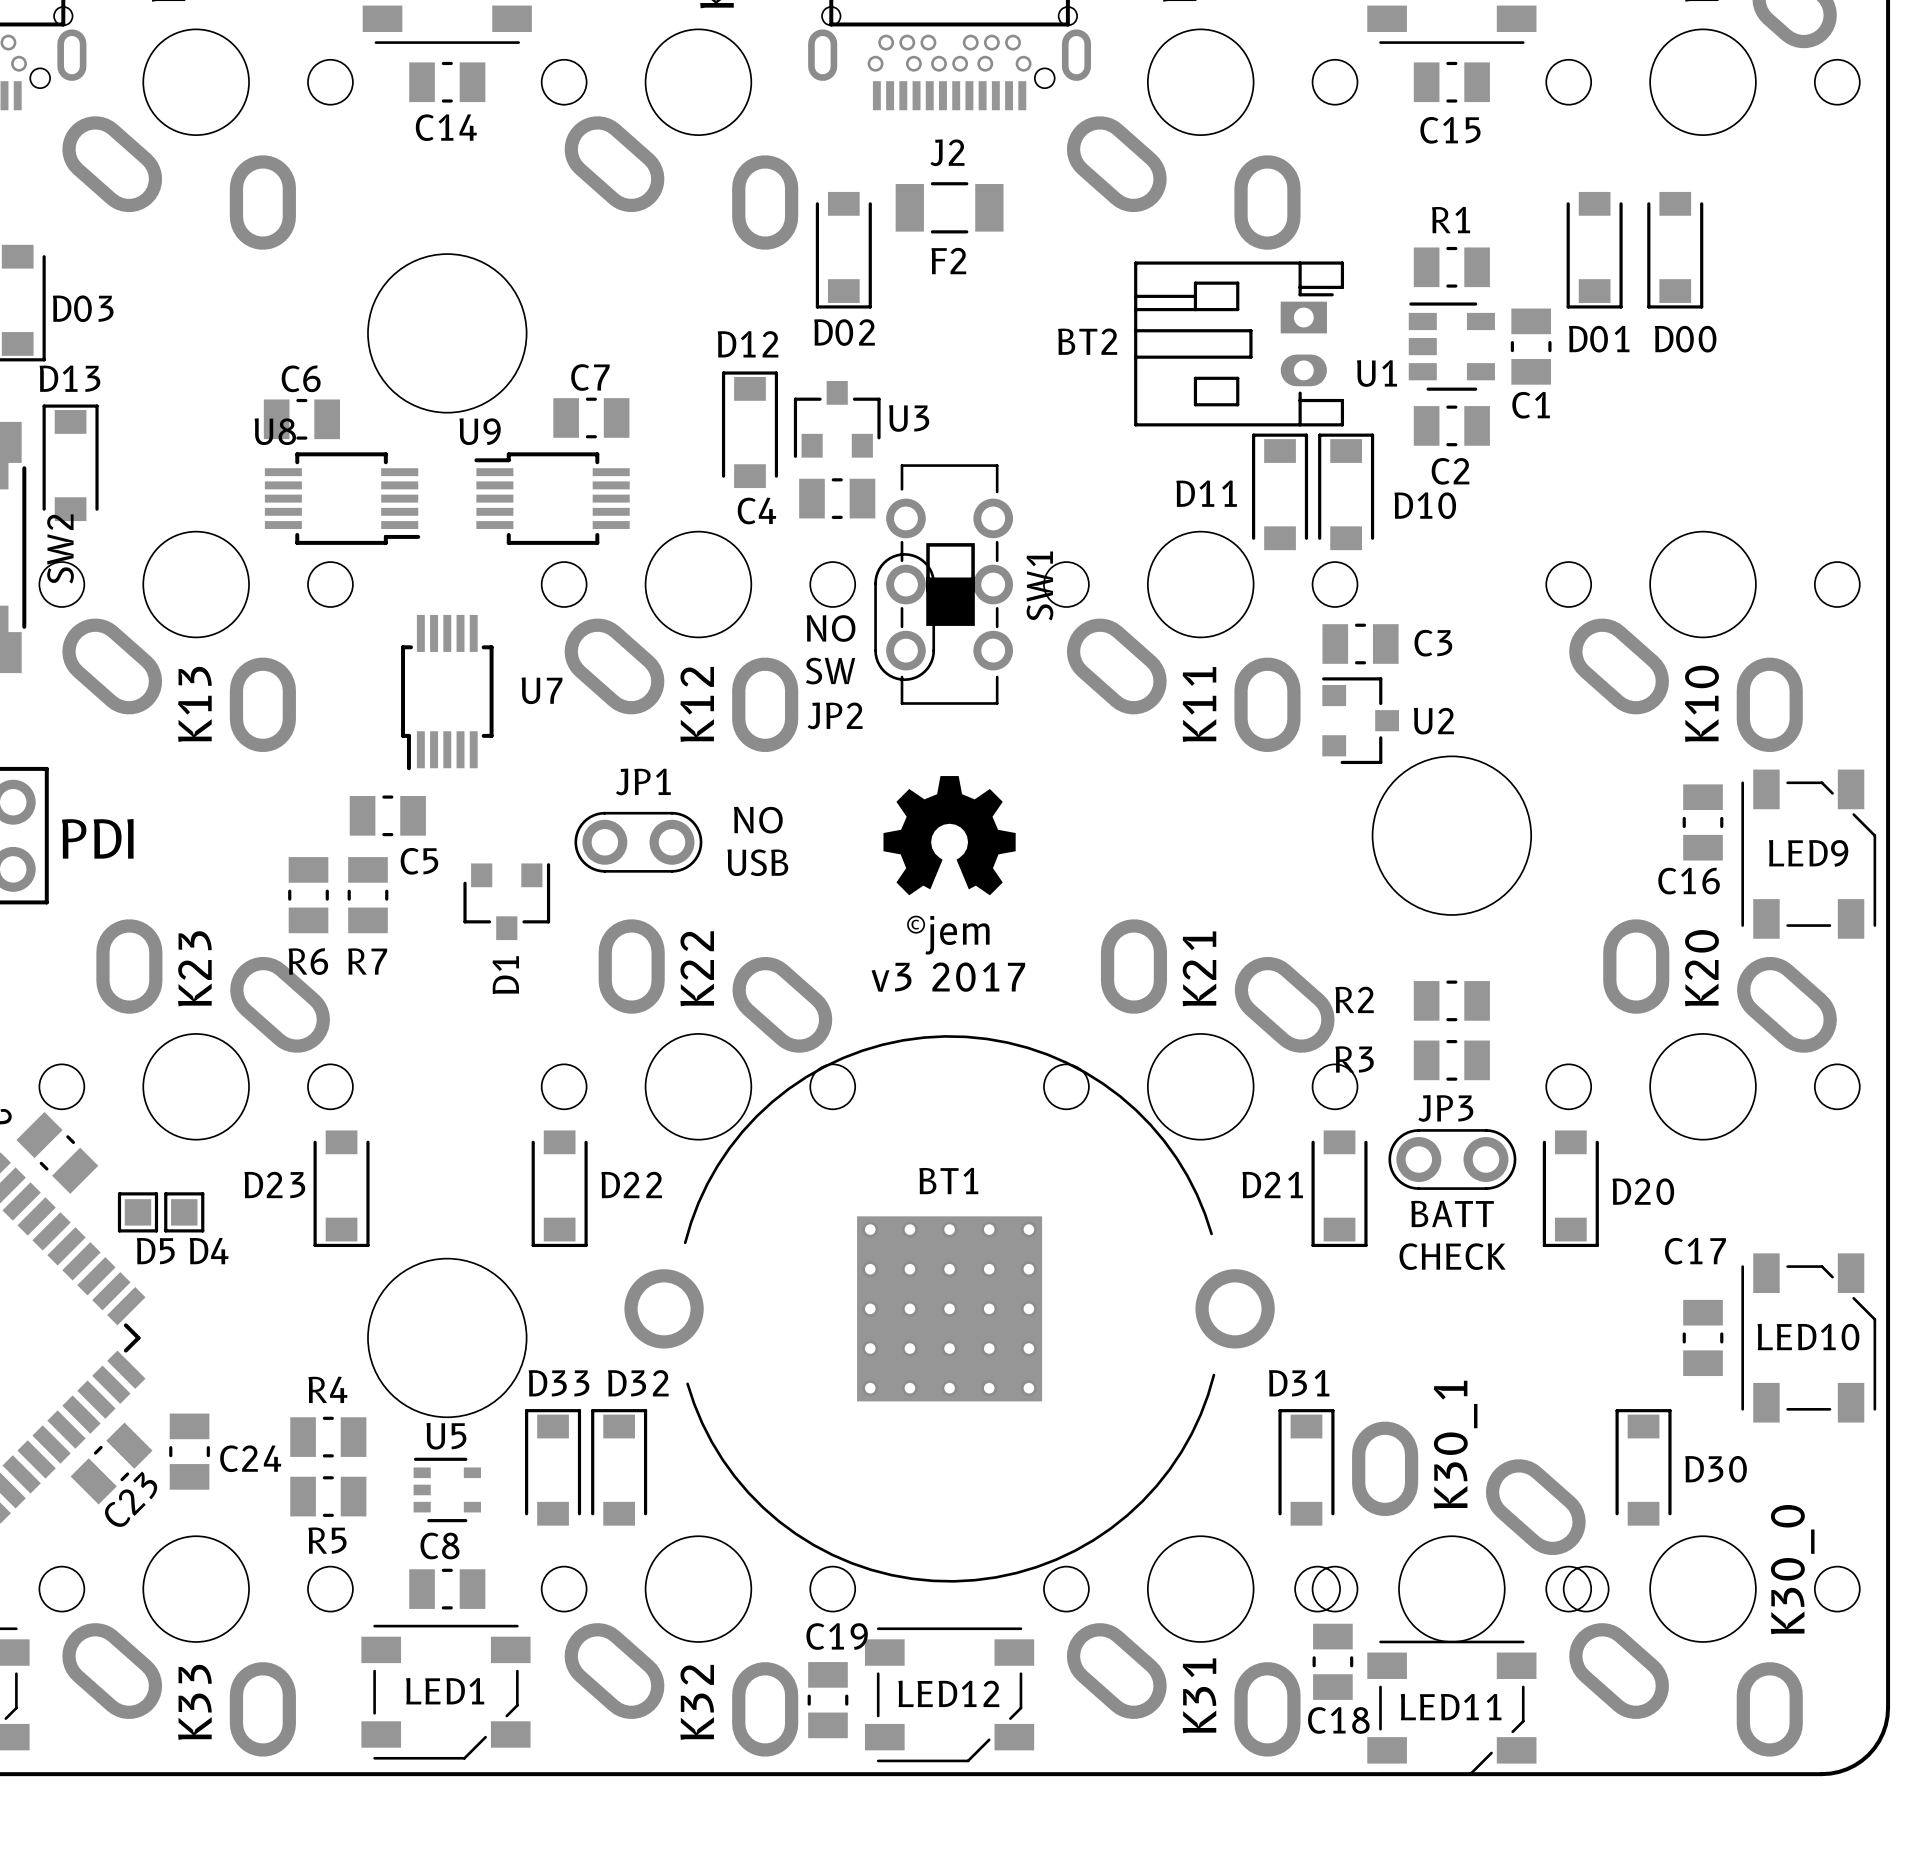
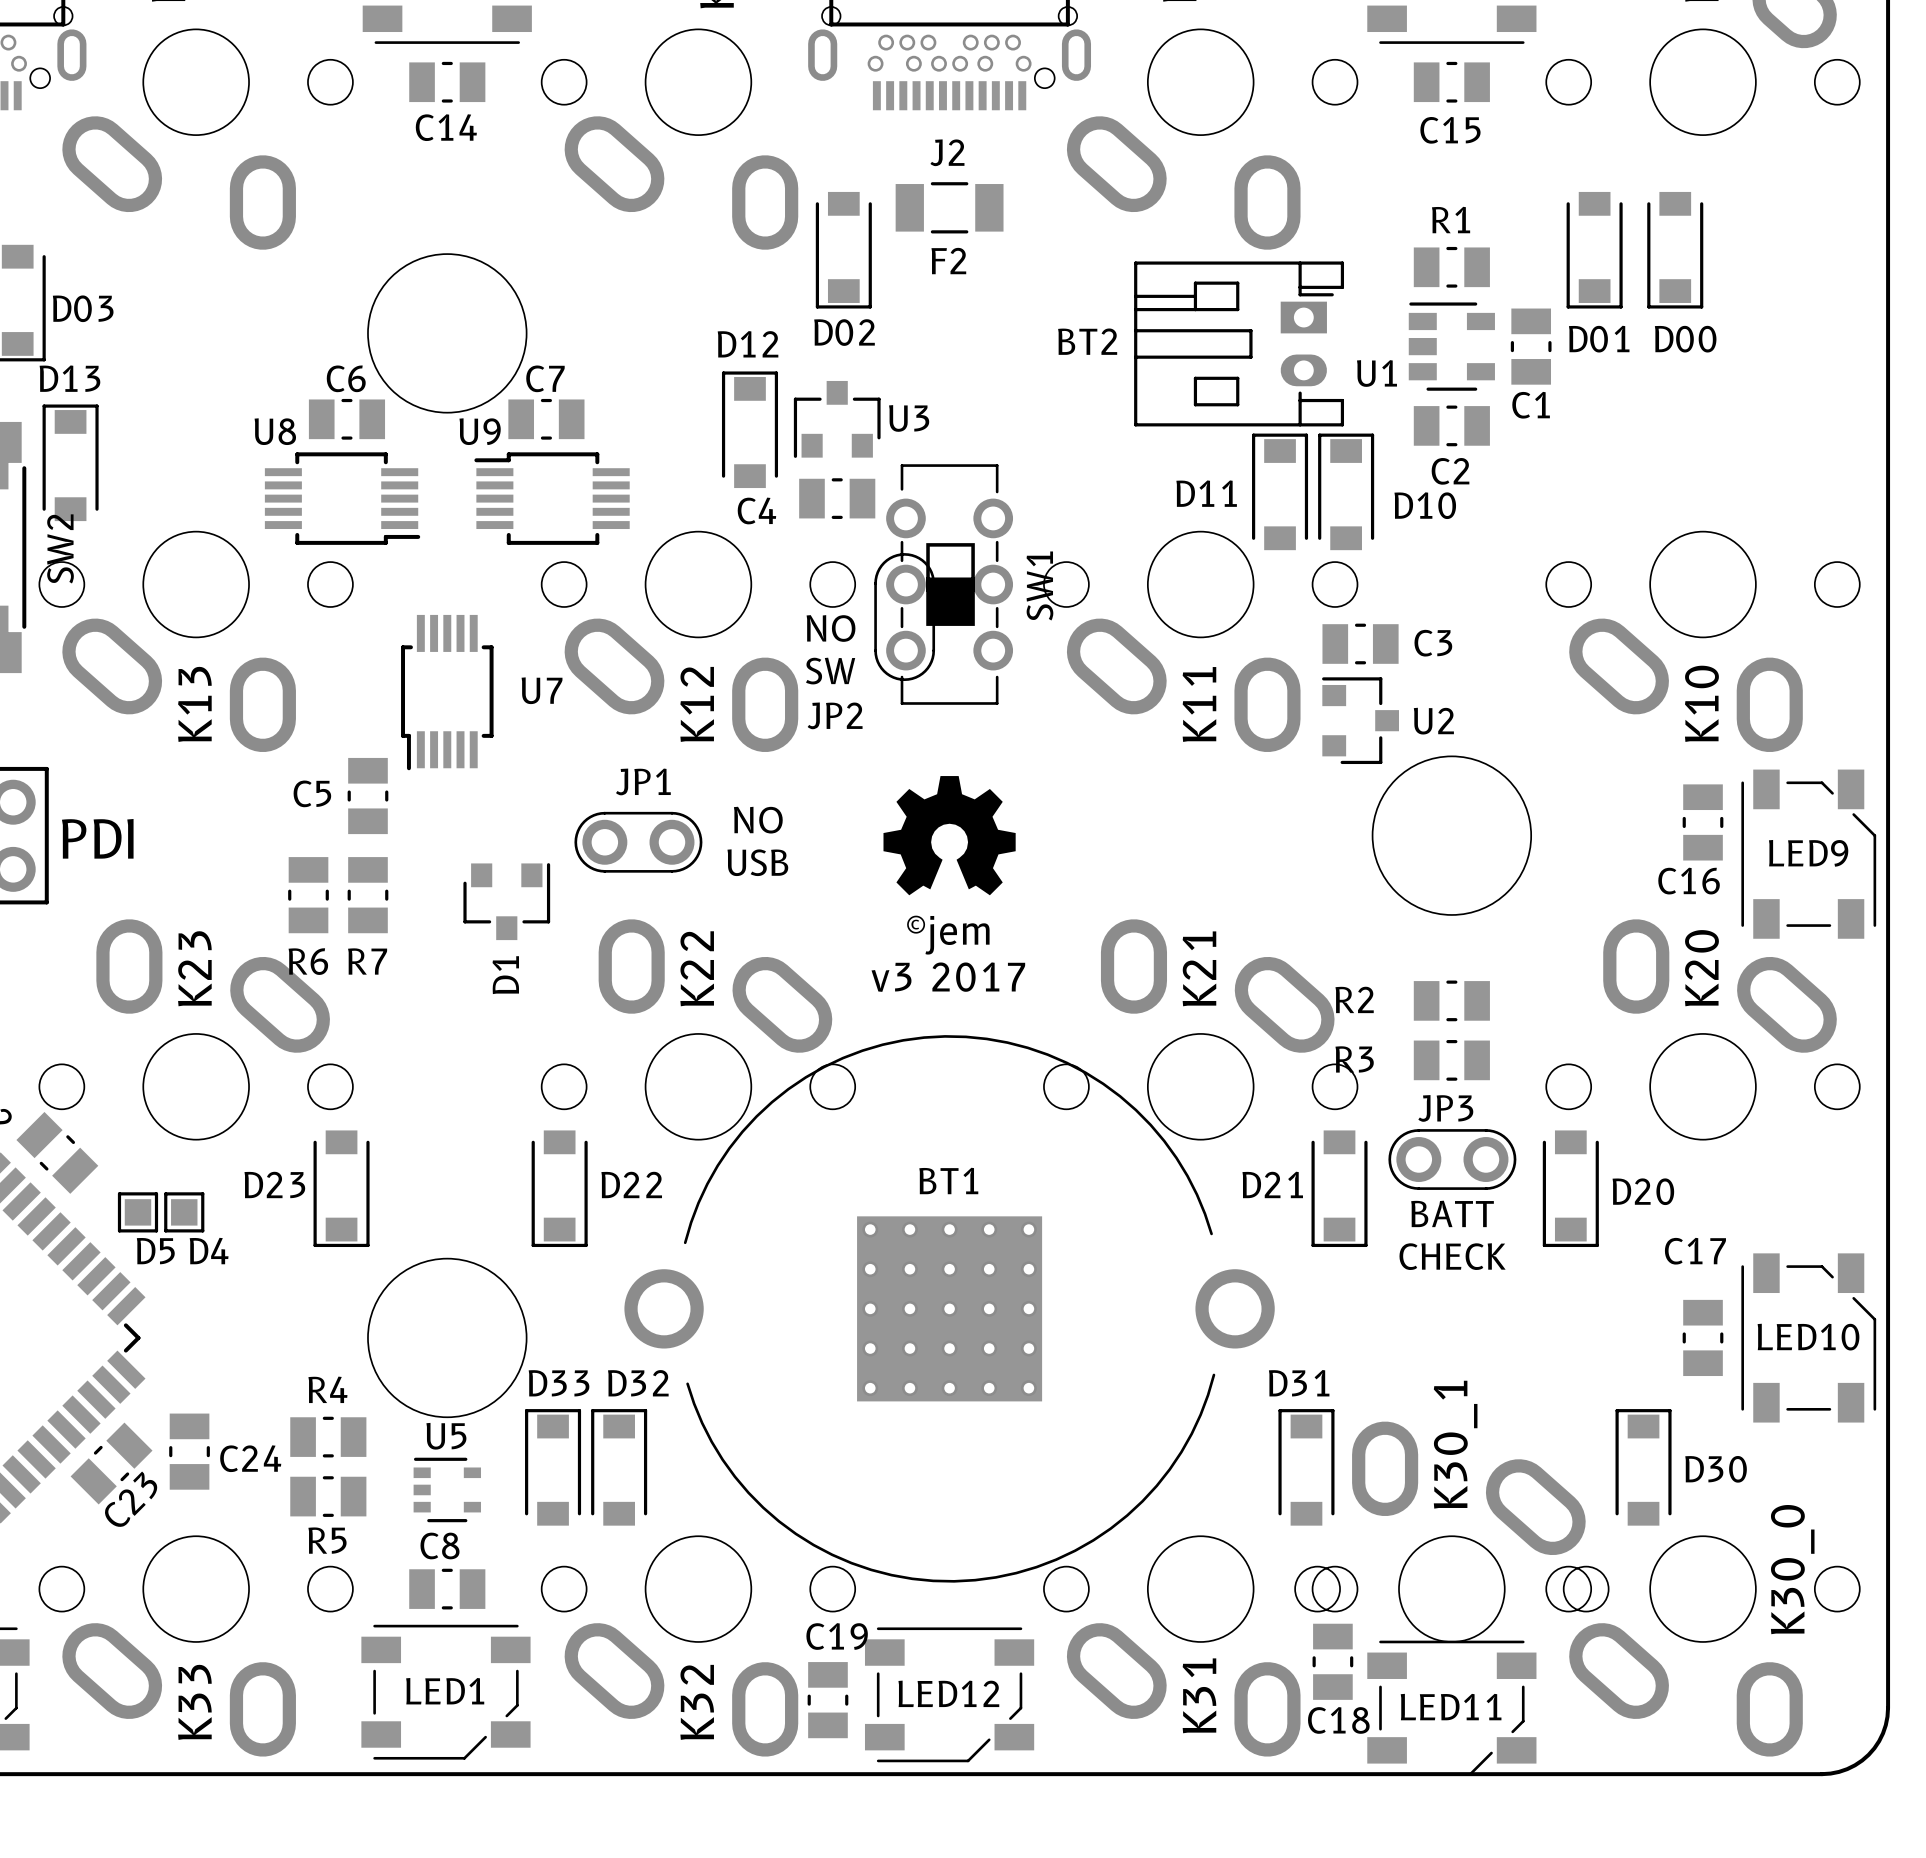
C7 position: (591, 417) -> (546, 419)
C6 position: (301, 419) -> (346, 419)
C5 rotation: 0° (387, 815) -> 90° clockwise (367, 796)

